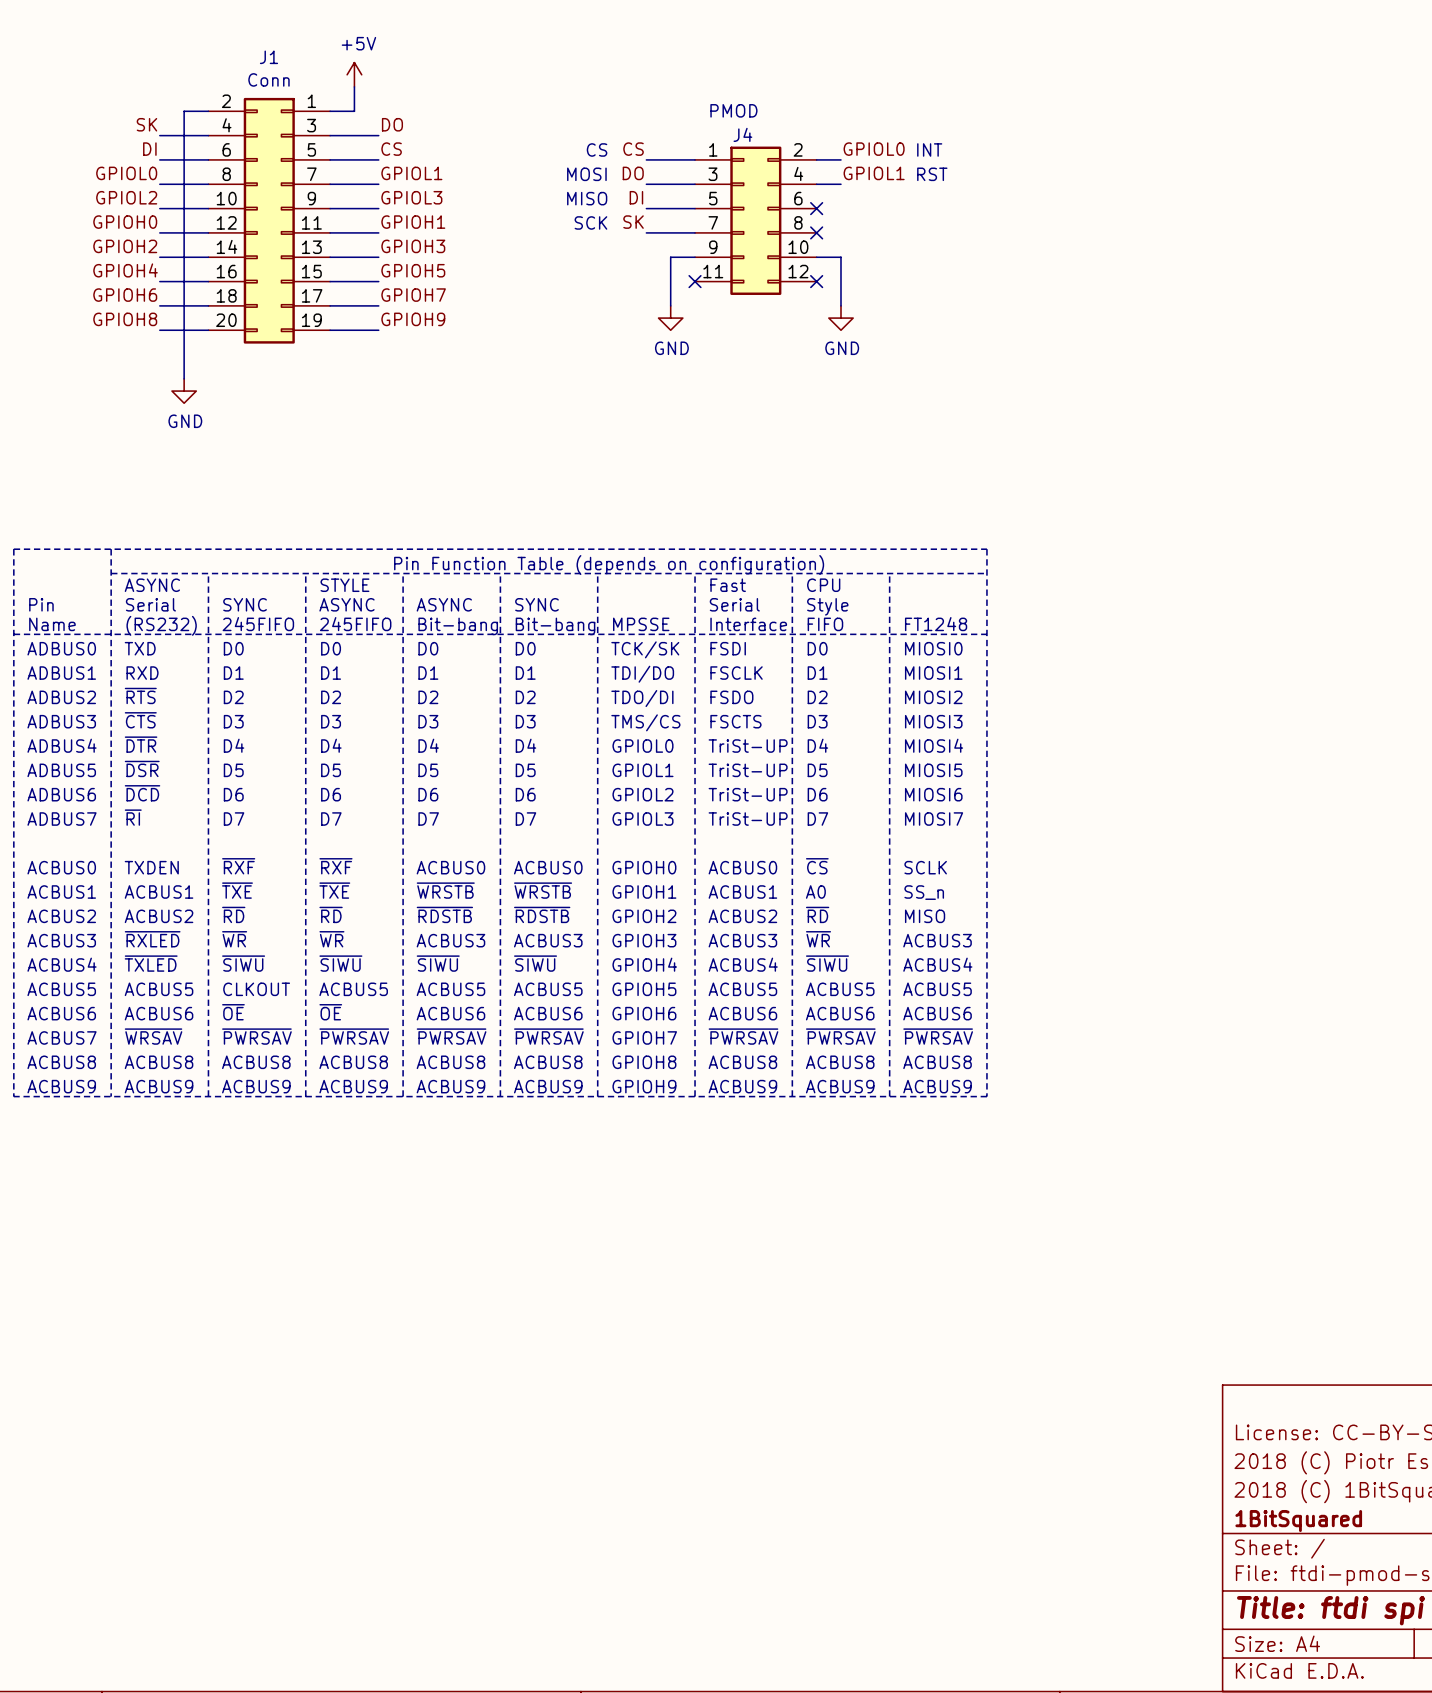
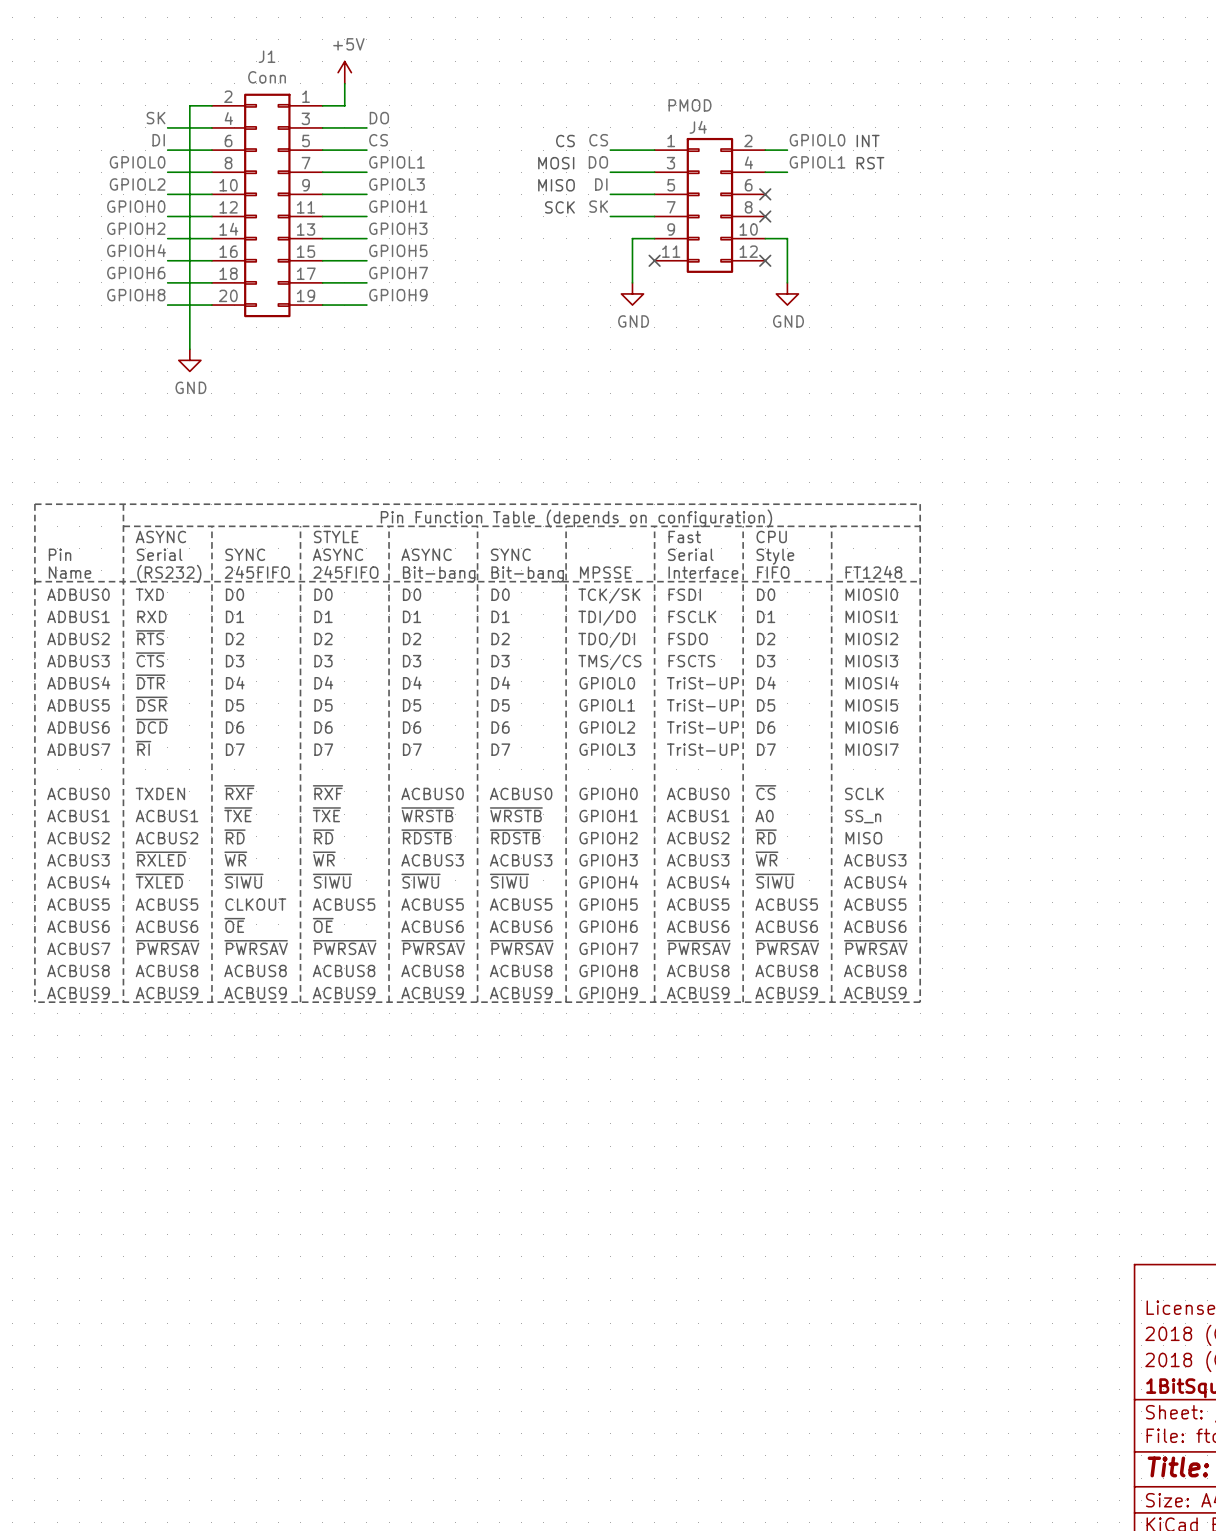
text: ~{WRSAV} (153, 1036) -> ~{PWRSAV} (167, 947)

